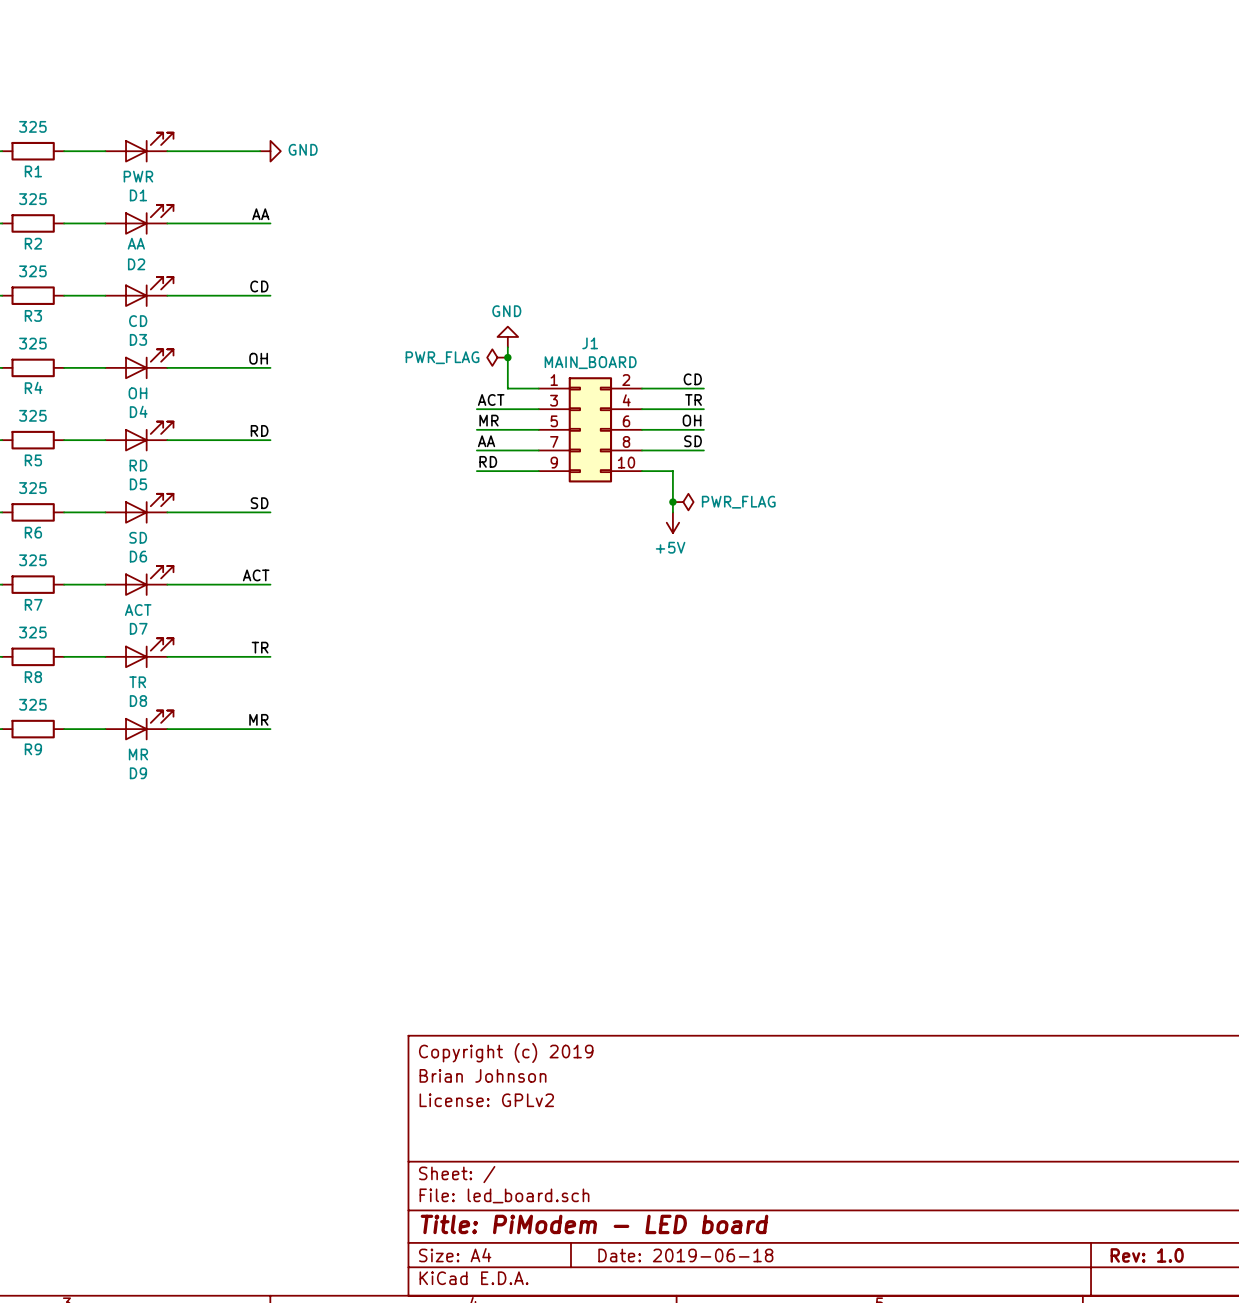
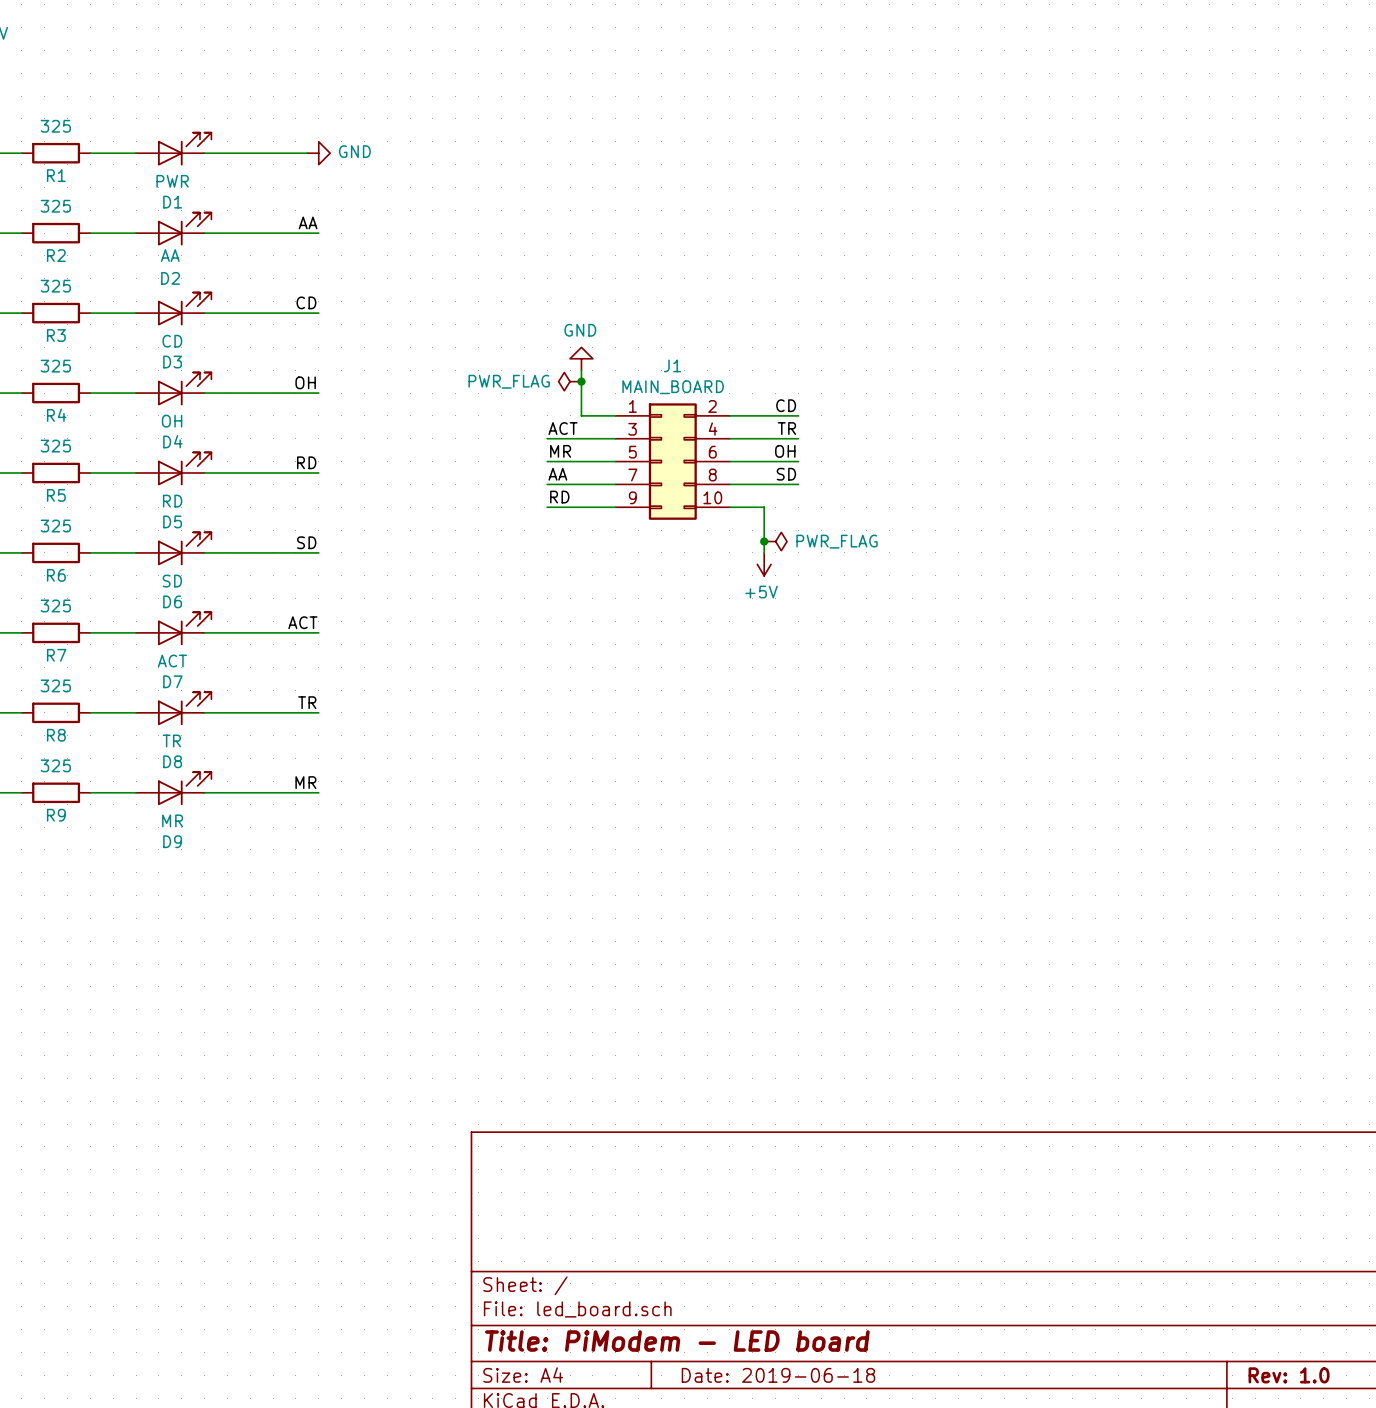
title block: Copyright (c) 2019 (506, 1052) -> none
title block: Brian Johnson (483, 1075) -> none
title block: License: GPLv2 (486, 1100) -> none

